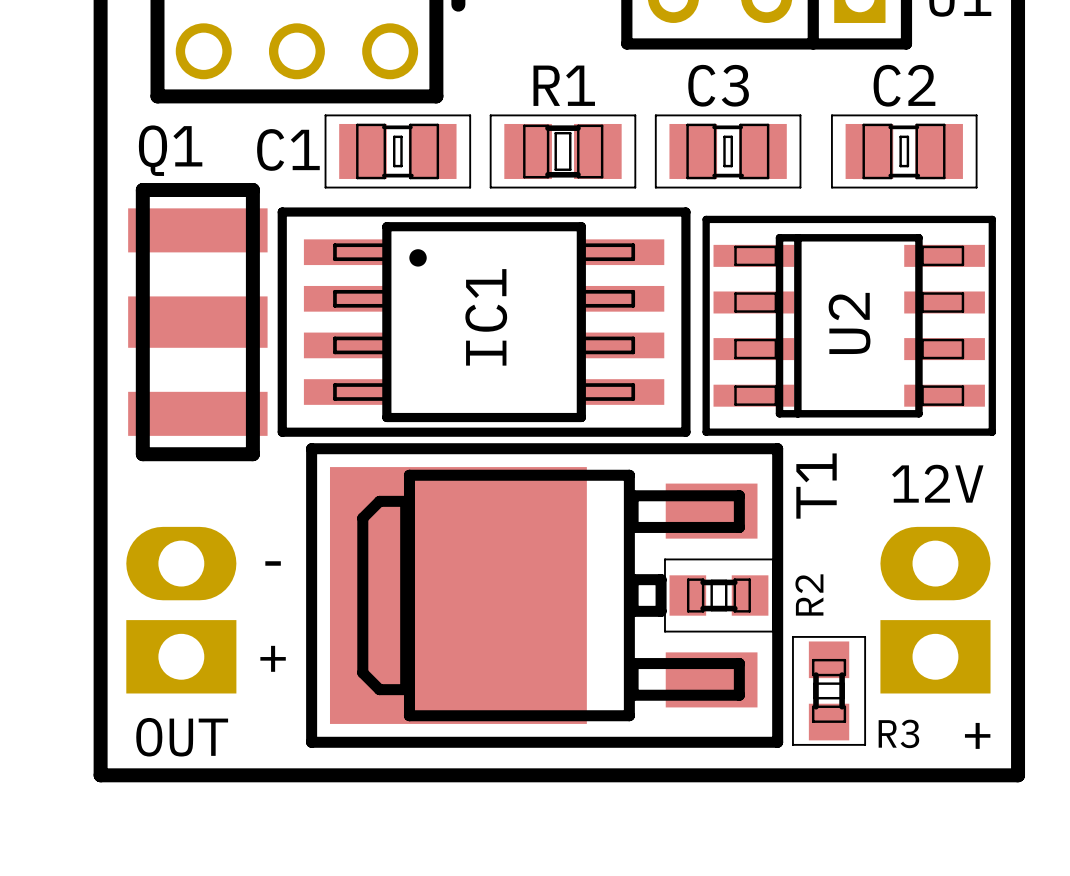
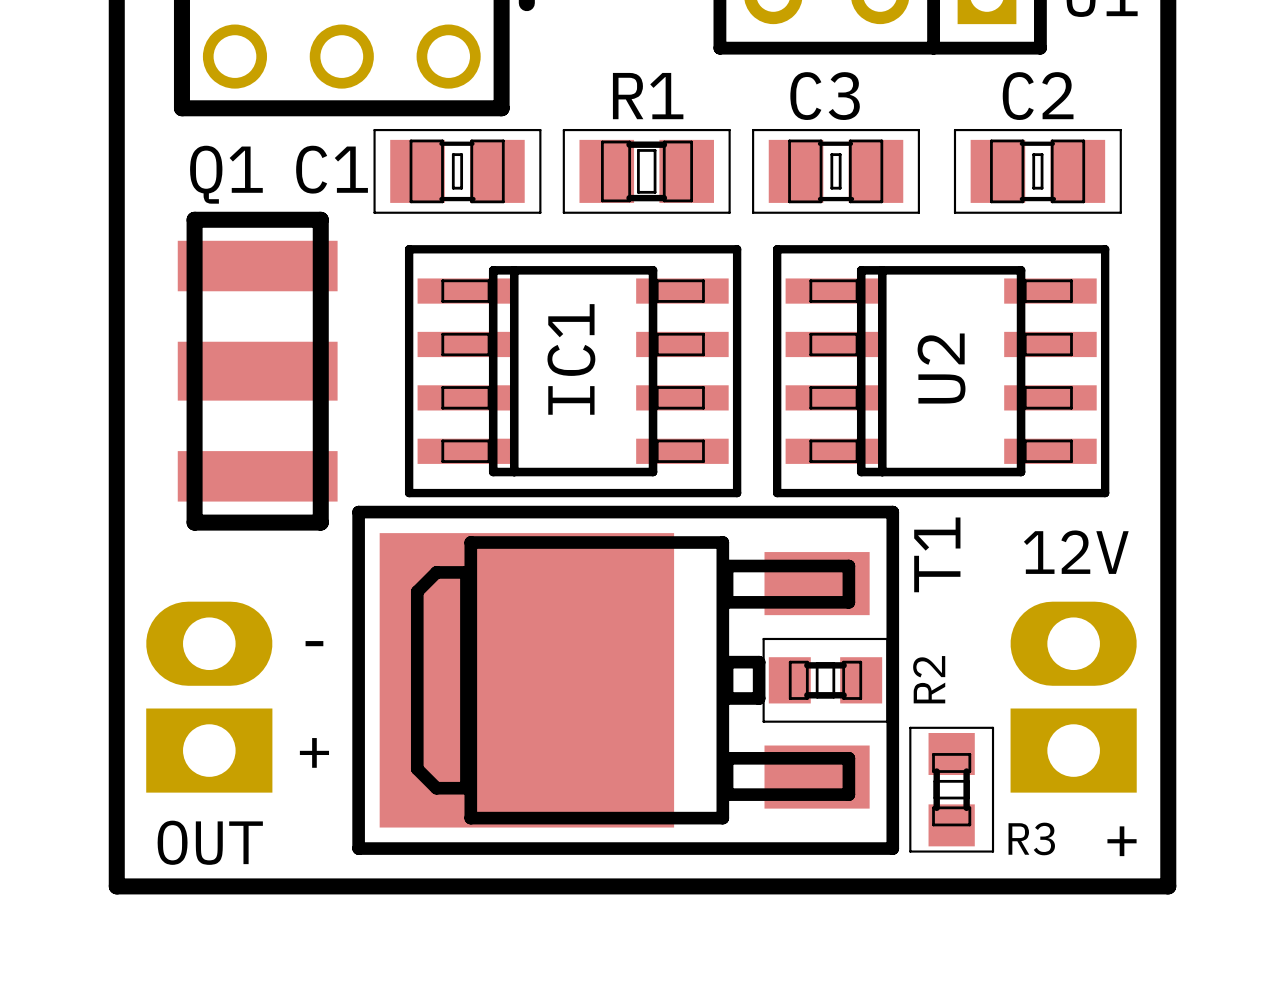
IC1 footprint: [277, 207, 691, 437] -> [404, 245, 742, 498]
Q1 position: (197, 322) -> (257, 371)
U2 position: (849, 325) -> (941, 371)

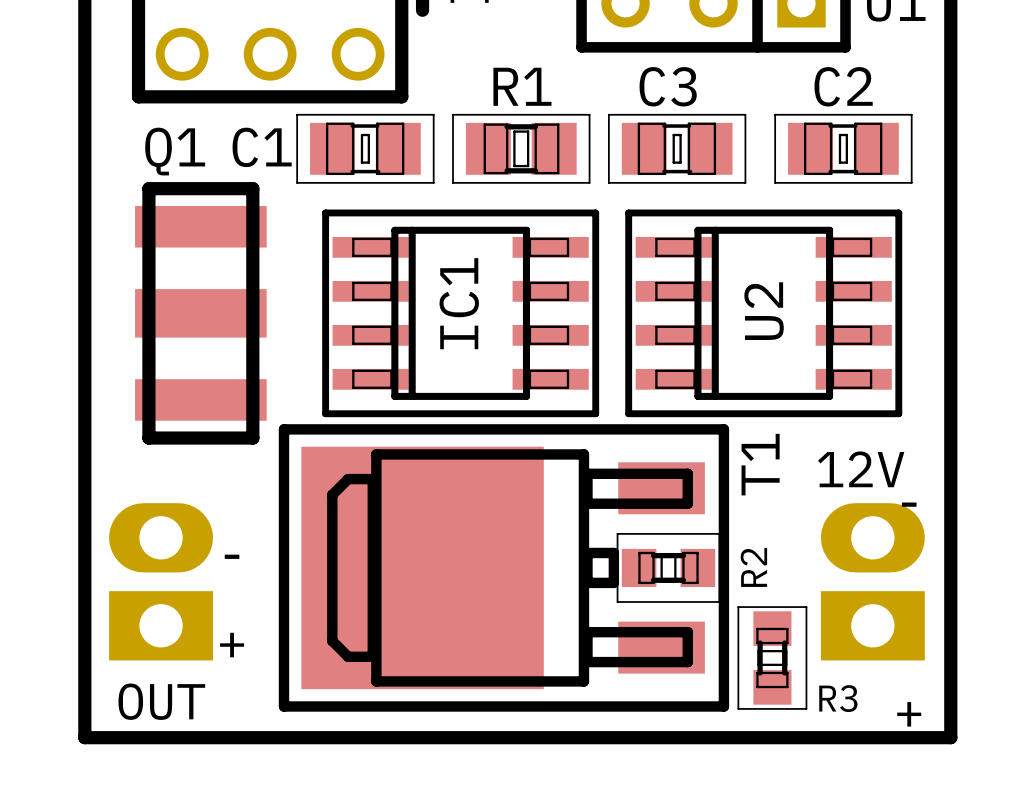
text position: 12V (1076, 552) -> 12V (861, 469)
text: none -> - (909, 504)
text position: - (314, 643) -> - (232, 556)
text position: + (314, 752) -> + (232, 645)
text position: + (1122, 841) -> + (909, 714)

